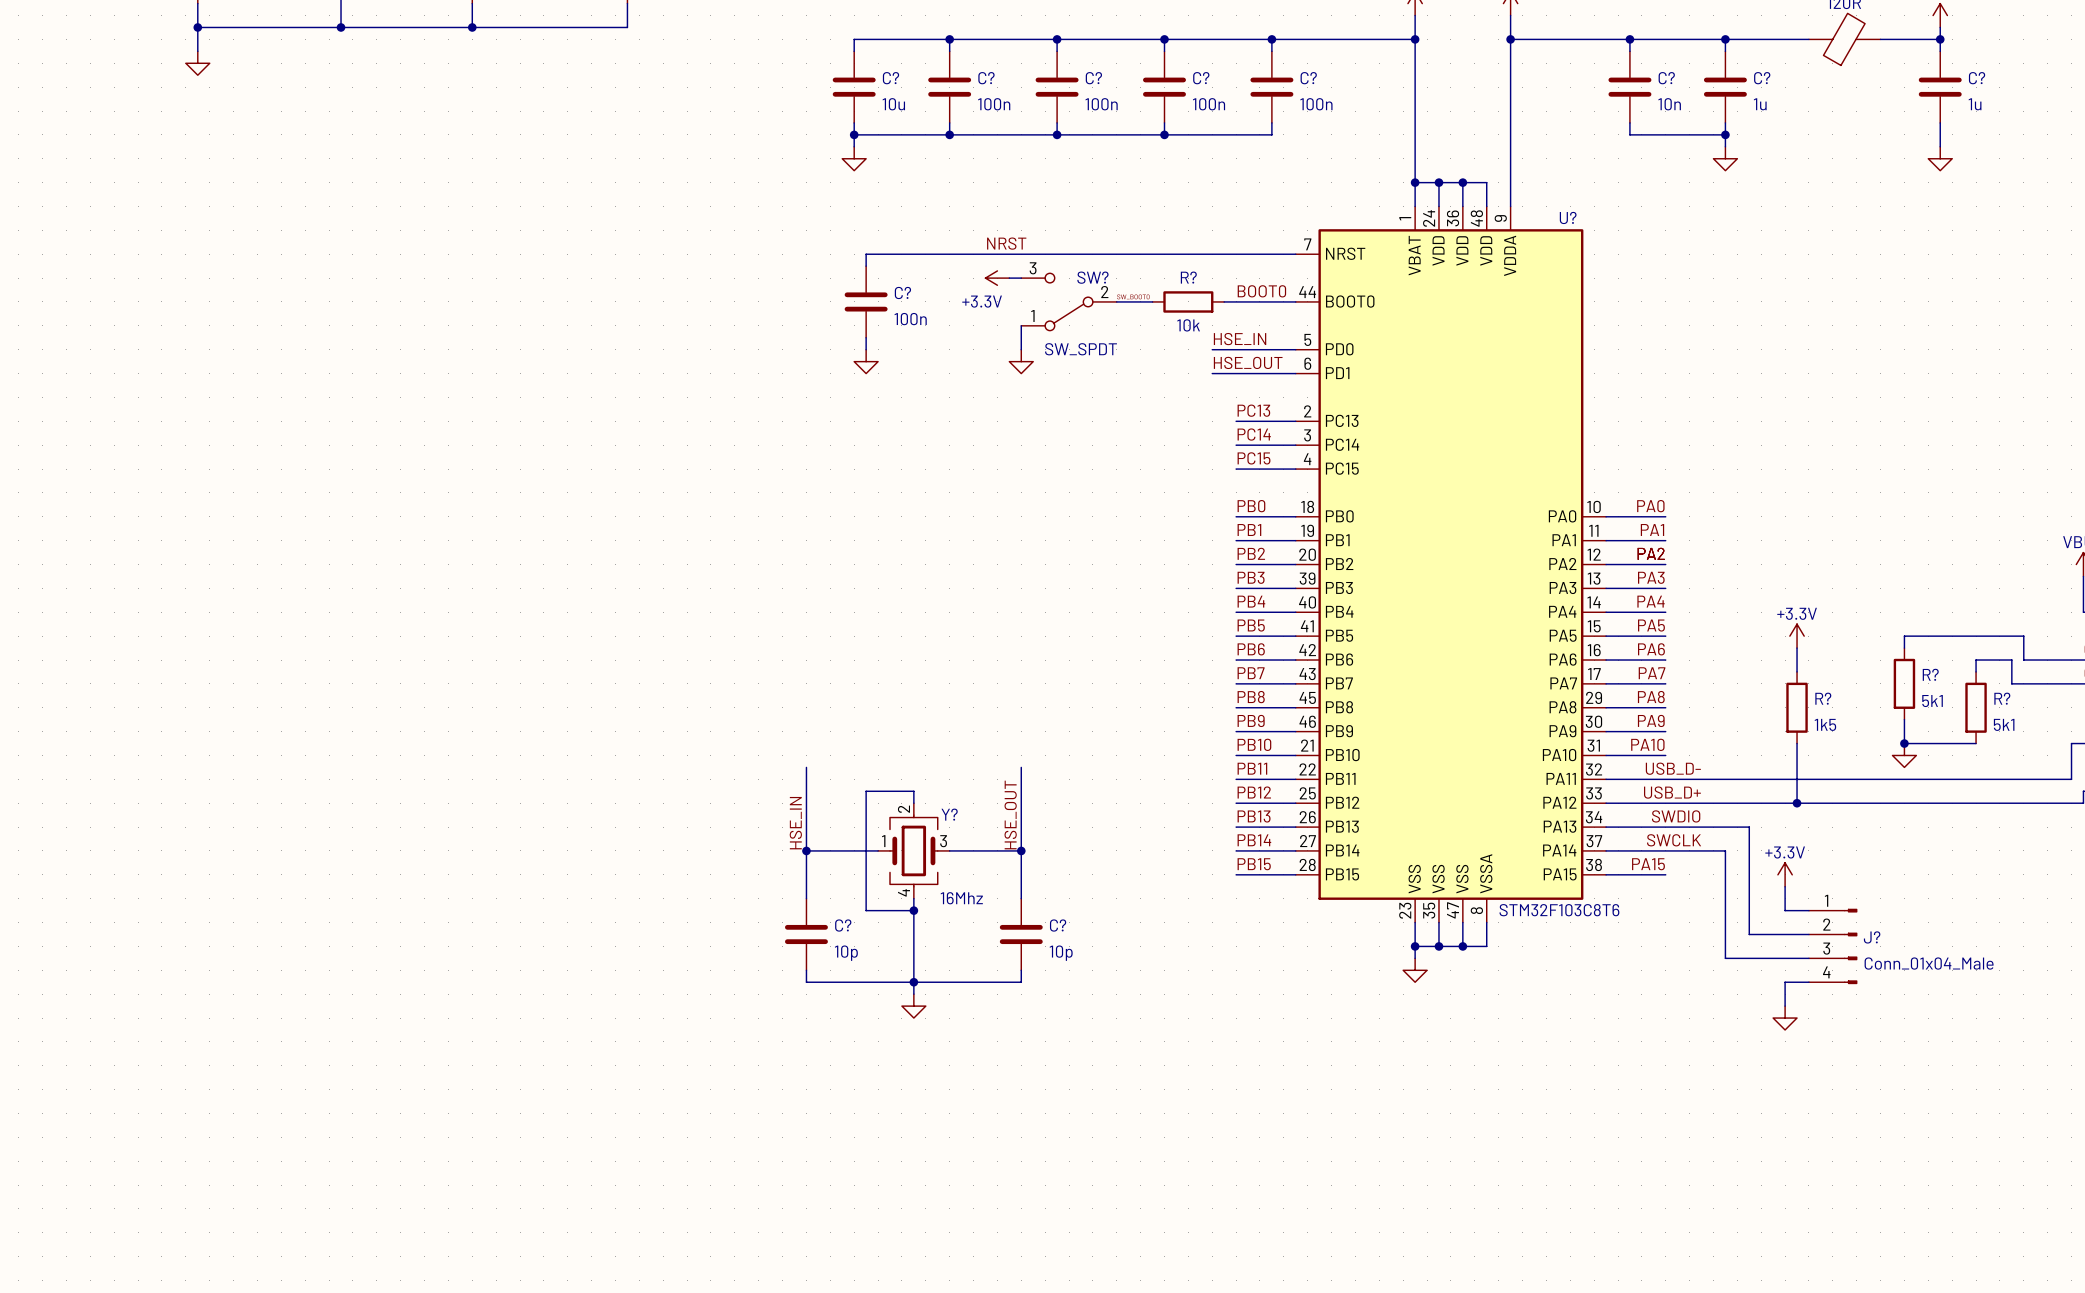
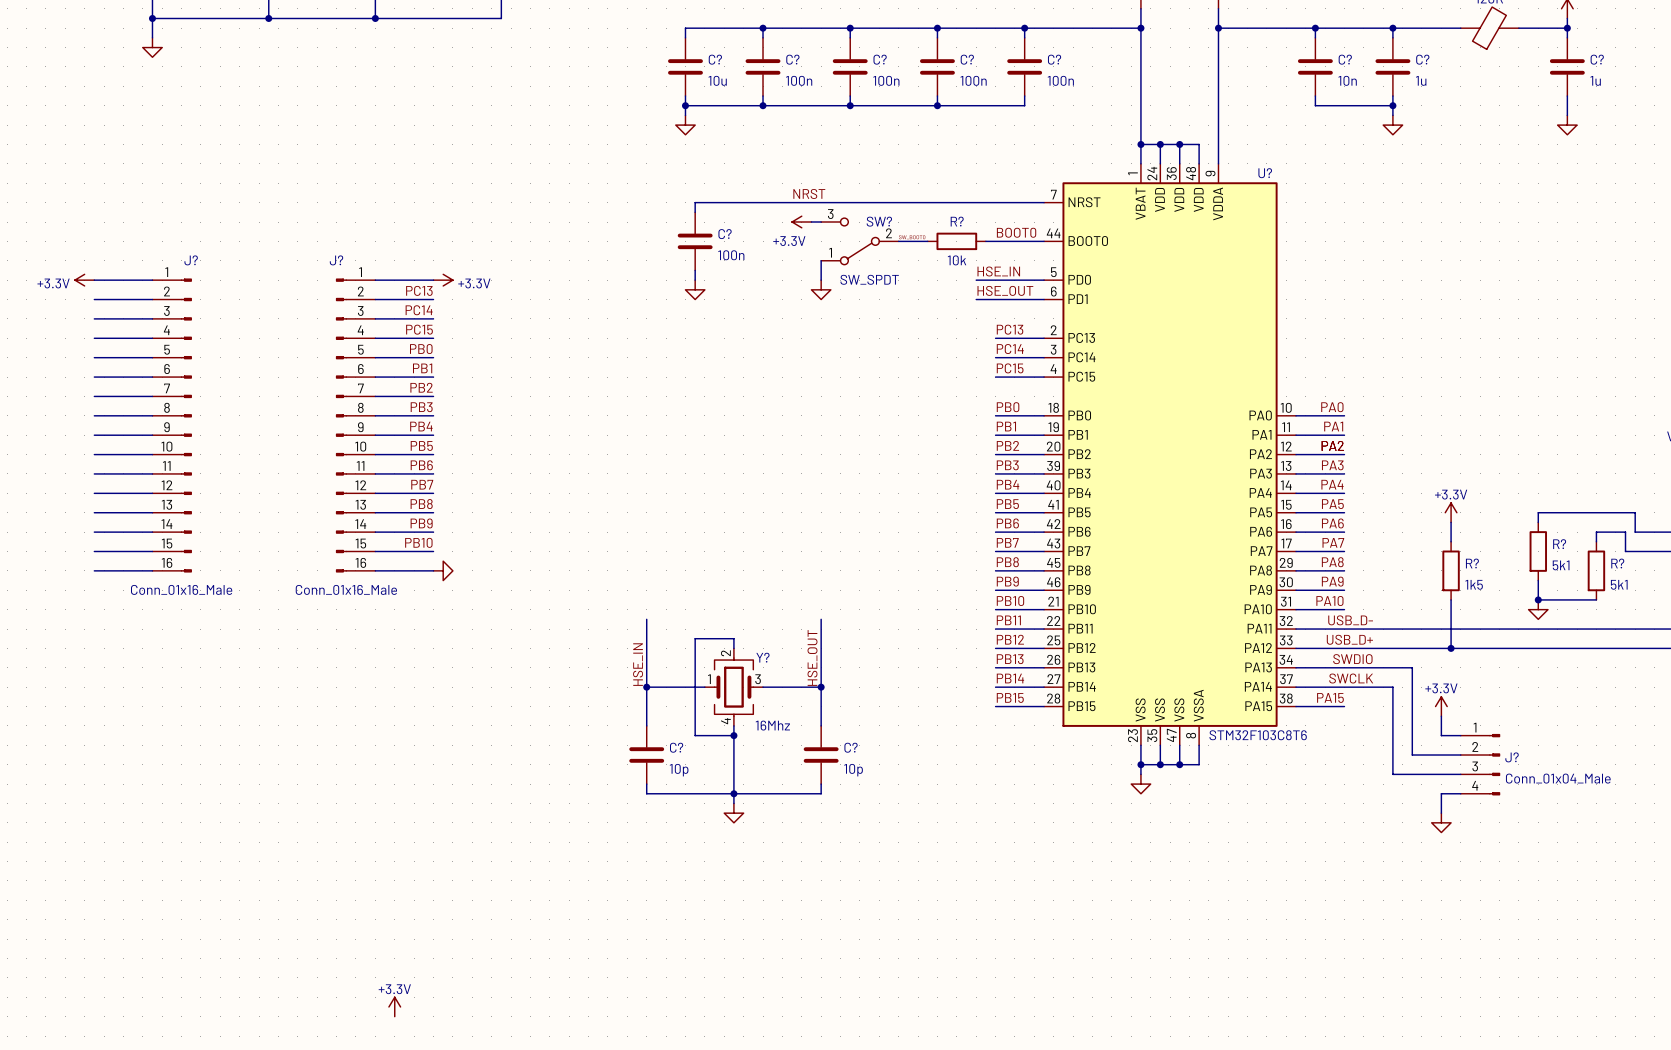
power symbol: none -> +3.3V (84, 280)
wire: none -> (94, 280) (152, 280)
wire: none -> (375, 280) (433, 280)
power symbol: none -> +3.3V (443, 280)
label: none -> PC13 (419, 290)
wire: none -> (94, 299) (152, 299)
wire: none -> (375, 299) (433, 299)
label: none -> PC14 (419, 310)
wire: none -> (94, 318) (152, 318)
wire: none -> (375, 318) (433, 318)
label: none -> PC15 (419, 329)
wire: none -> (94, 338) (152, 338)
wire: none -> (375, 338) (433, 338)
label: none -> PB0 (421, 349)
wire: none -> (94, 357) (152, 357)
wire: none -> (375, 357) (433, 357)
label: none -> PB1 (422, 368)
wire: none -> (94, 377) (152, 377)
wire: none -> (375, 377) (433, 377)
label: none -> PB2 (421, 387)
wire: none -> (94, 396) (152, 396)
wire: none -> (375, 396) (433, 396)
label: none -> PB3 (421, 407)
wire: none -> (94, 415) (152, 415)
wire: none -> (375, 415) (433, 415)
J?: none -> Conn_01x16_Male (172, 425)
J?: none -> Conn_01x16_Male (355, 425)
label: none -> PB4 (421, 426)
wire: none -> (94, 435) (152, 435)
wire: none -> (375, 435) (433, 435)
label: none -> PB5 (421, 445)
wire: none -> (94, 454) (152, 454)
wire: none -> (375, 454) (433, 454)
label: none -> PB6 (421, 465)
wire: none -> (94, 473) (152, 473)
wire: none -> (375, 473) (433, 473)
label: none -> PB7 (422, 484)
wire: none -> (94, 493) (152, 493)
wire: none -> (375, 493) (433, 493)
label: none -> PB8 (421, 504)
wire: none -> (94, 512) (152, 512)
wire: none -> (375, 512) (433, 512)
label: none -> PB9 (421, 523)
wire: none -> (94, 532) (152, 532)
wire: none -> (375, 532) (433, 532)
label: none -> PB10 (418, 542)
wire: none -> (94, 551) (152, 551)
wire: none -> (375, 551) (433, 551)
wire: none -> (94, 570) (152, 570)
wire: none -> (375, 570) (433, 570)
power symbol: none -> (443, 570)
power symbol: none -> +3.3V (394, 1006)

